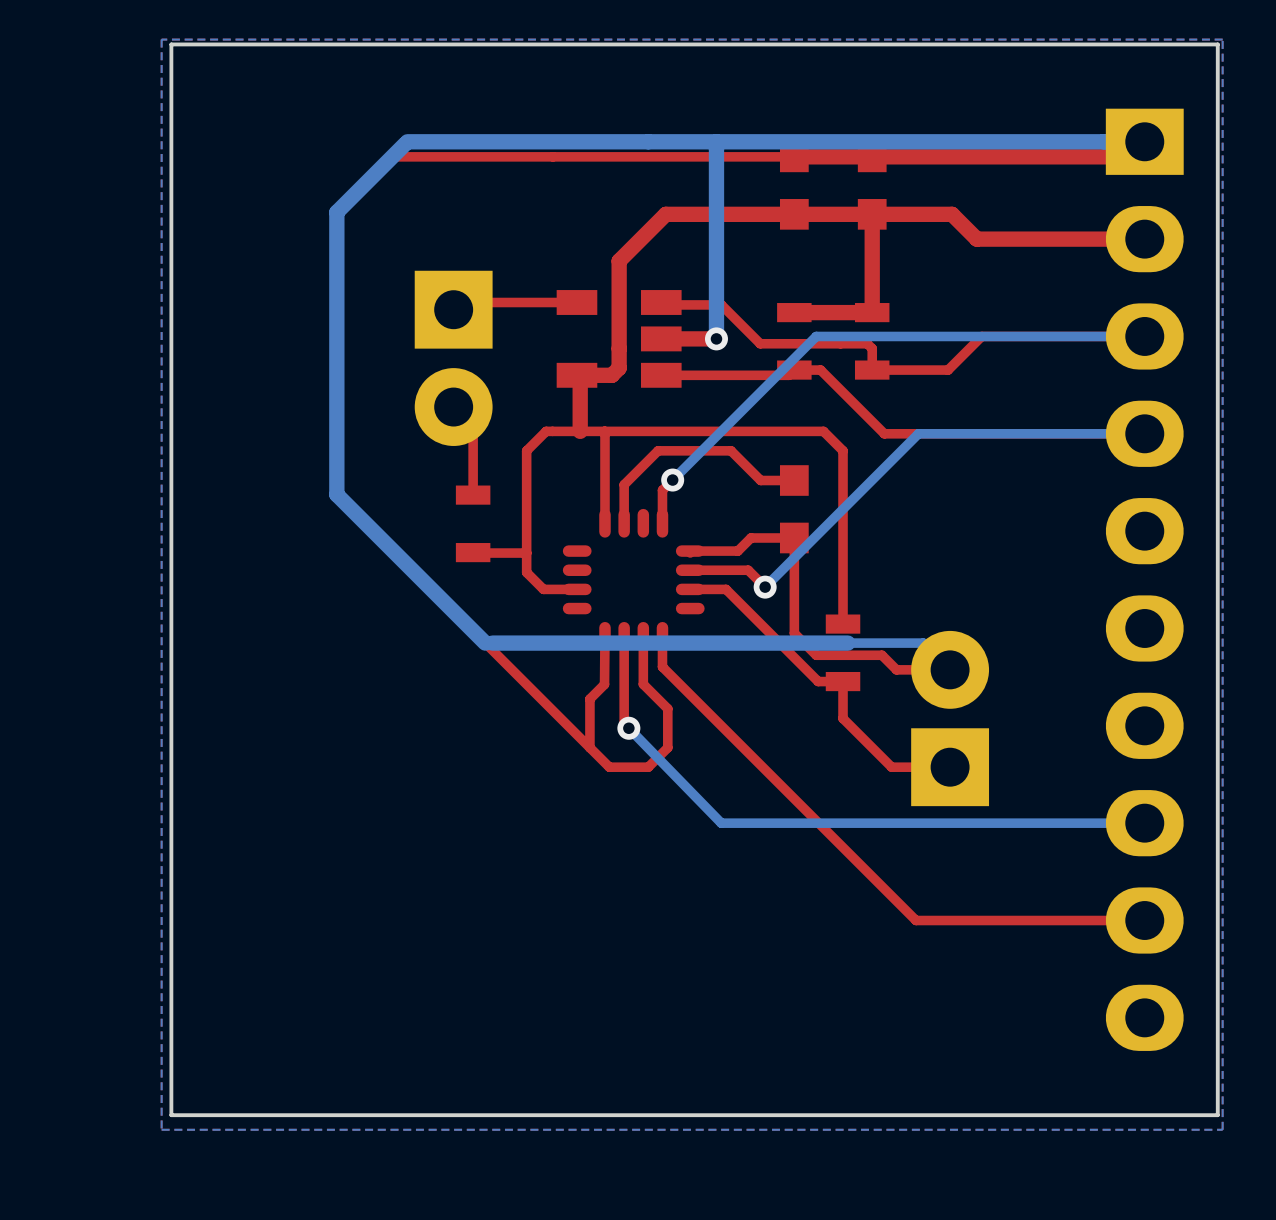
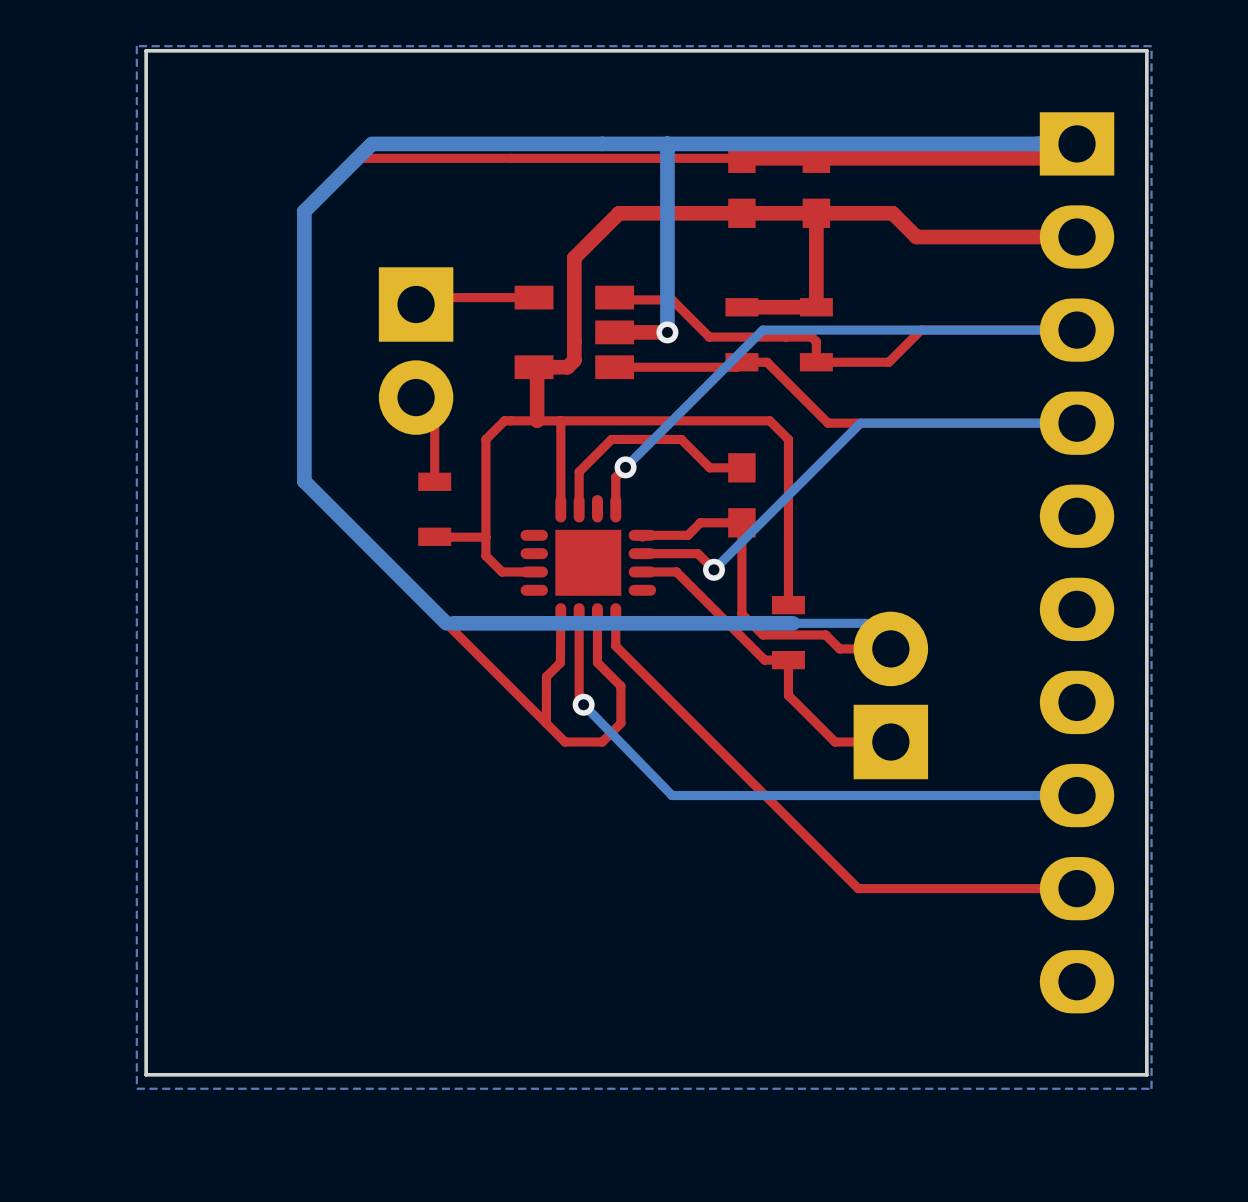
part footprint: [562, 508, 705, 651] -> [520, 495, 657, 631]

